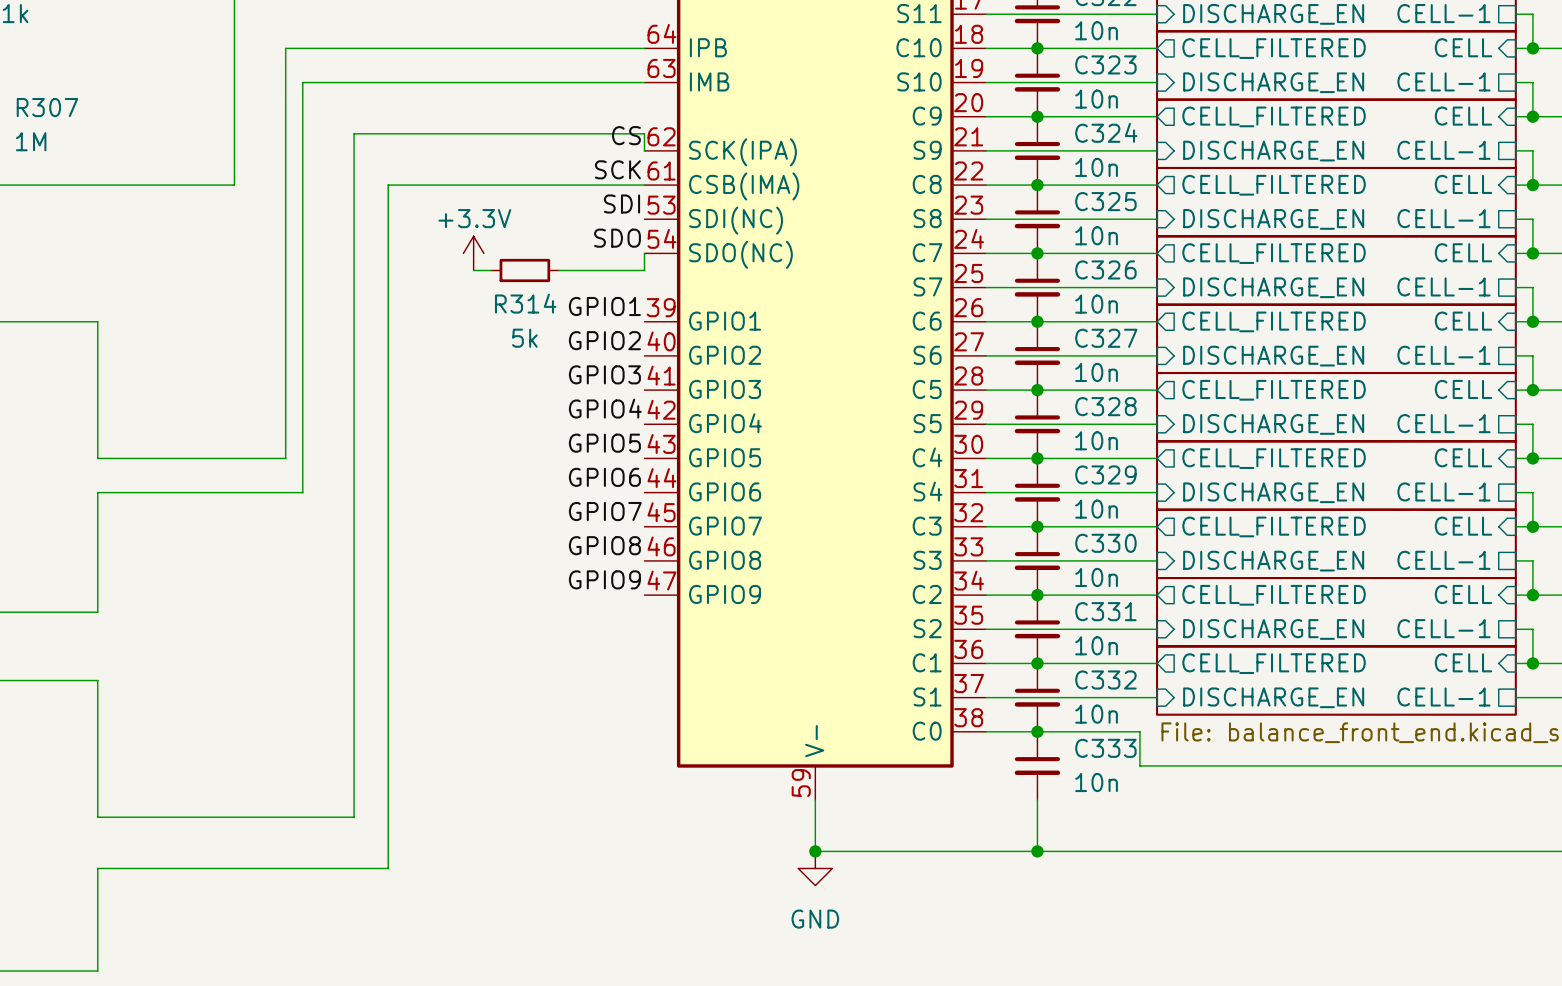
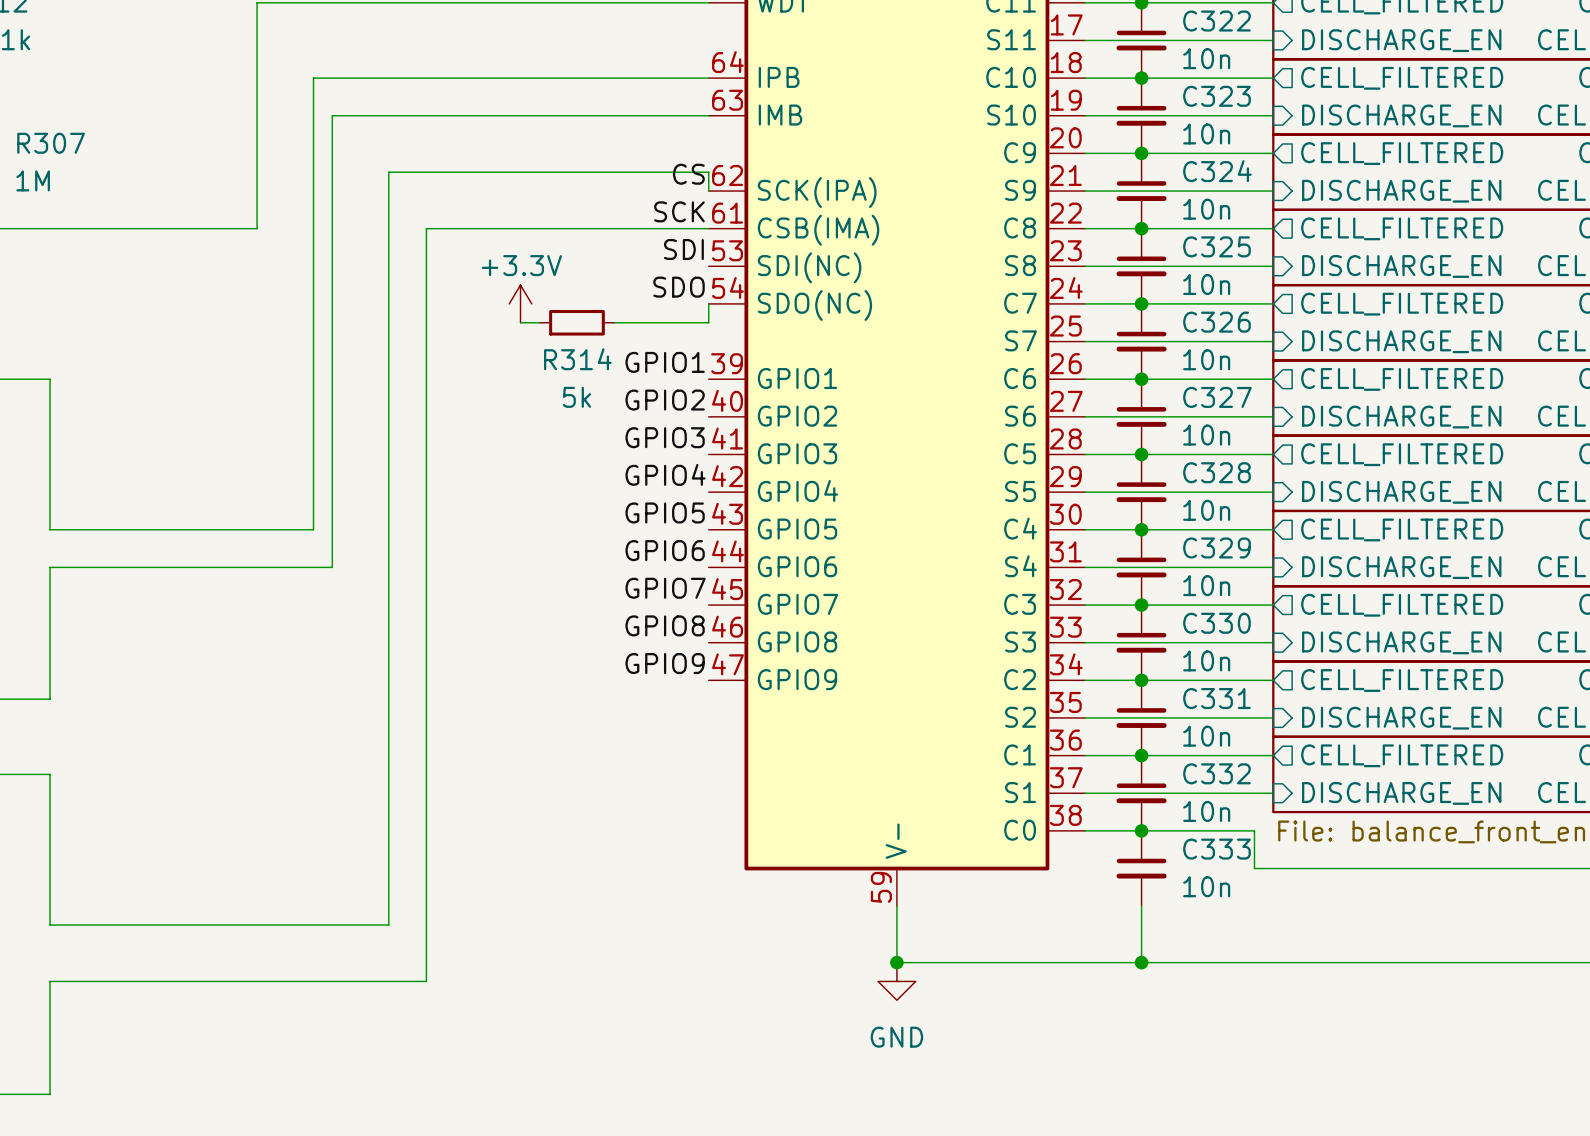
wire: (46, 321) (97, 321) (97, 458) -> (50, 379) (50, 529) (106, 529)
wire: (97, 492) (97, 612) (46, 612) -> (106, 567) (50, 567) (50, 699)
wire: (46, 680) (97, 680) (97, 817) -> (50, 774) (50, 924) (106, 924)
wire: (97, 868) (97, 970) (46, 970) -> (106, 981) (50, 981) (50, 1094)

